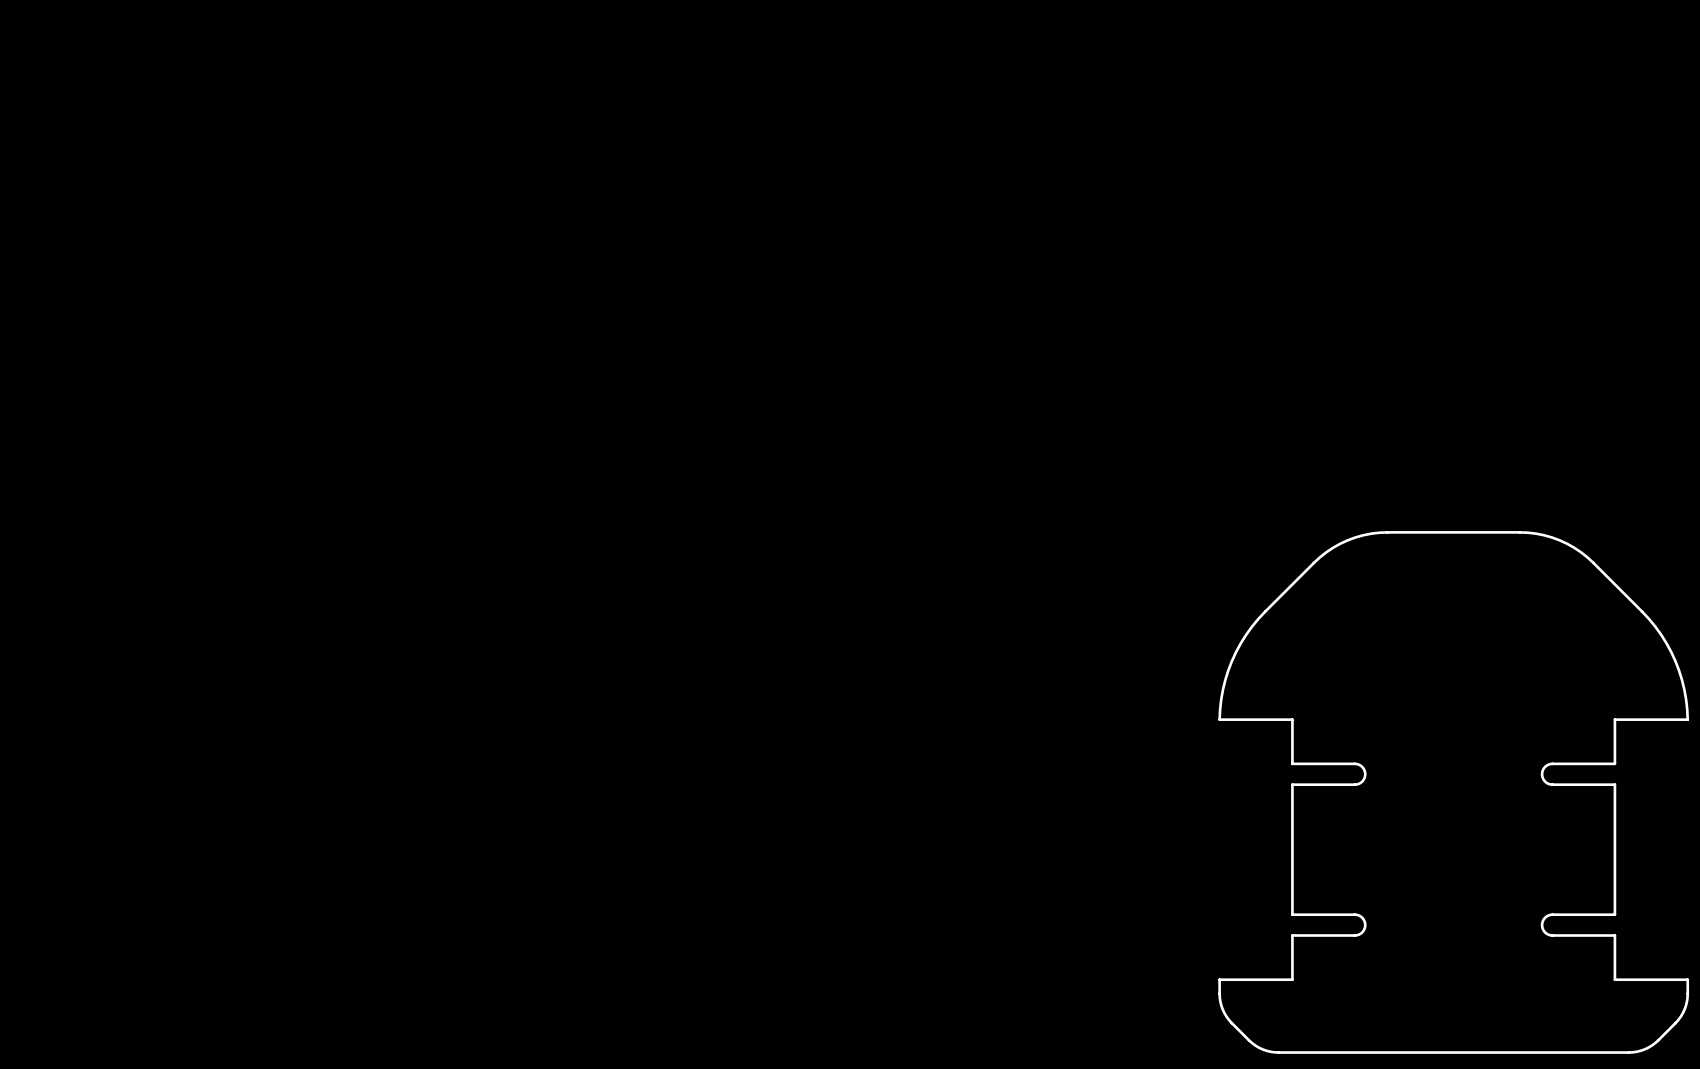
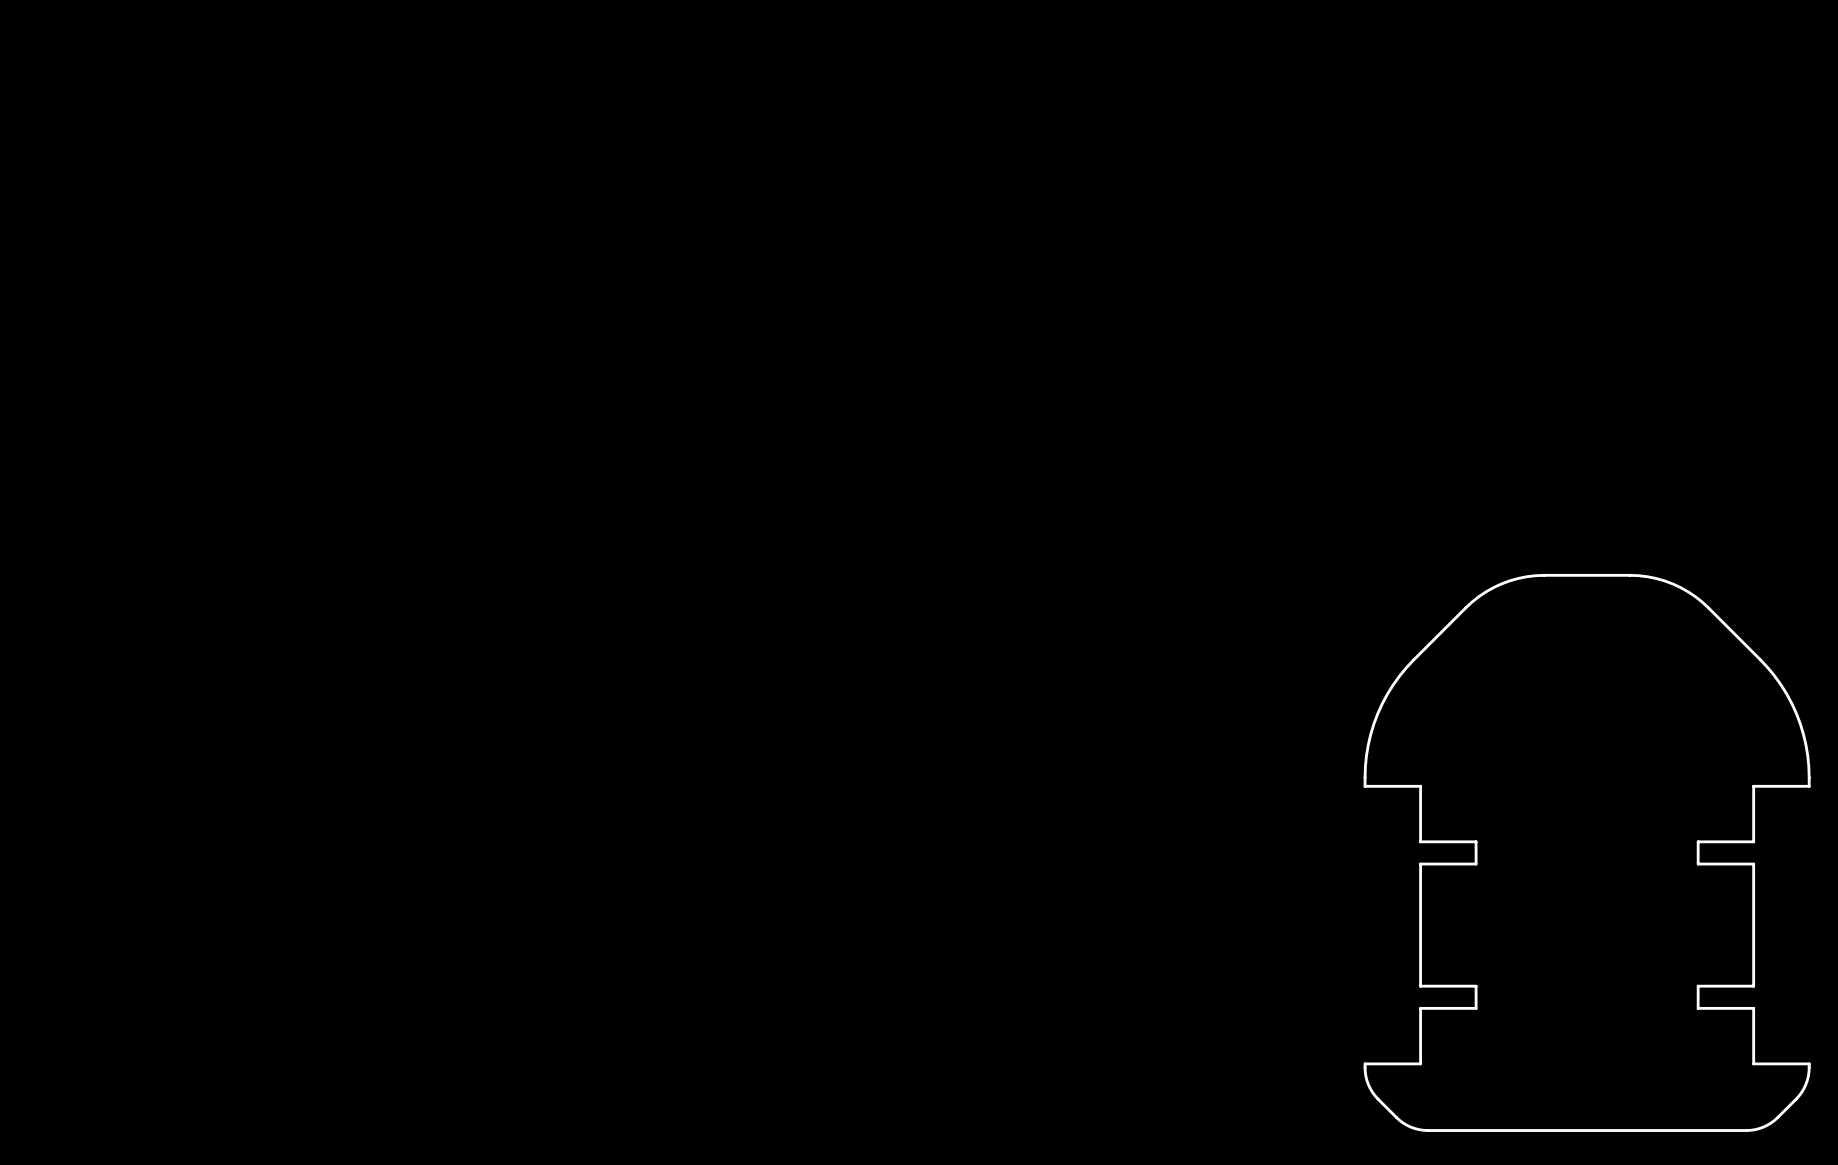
board edge: (1439, 532) (1371, 533) (1347, 540) (1326, 552) (1252, 626) (1236, 652) (1222, 689) (1219, 719) (1292, 719) (1292, 763) (1356, 763) (1361, 766) (1364, 771) (1363, 780) (1356, 784) (1292, 784) (1292, 914) (1357, 915) (1364, 921) (1363, 931) (1354, 935) (1292, 935) (1292, 979) (1219, 979) (1219, 997) (1224, 1013) (1231, 1023) (1255, 1045) (1274, 1052) (1330, 1052) -> (1544, 575) (1526, 576) (1501, 583) (1479, 596) (1465, 607) (1413, 659) (1393, 685) (1377, 713) (1368, 745) (1365, 786) (1420, 786) (1420, 841) (1476, 841) (1476, 864) (1420, 864) (1420, 986) (1476, 986) (1476, 1008) (1420, 1008) (1420, 1063) (1365, 1063) (1368, 1084) (1378, 1099) (1403, 1123) (1414, 1128) (1427, 1130)
board edge: (1642, 611) (1661, 634) (1675, 661) (1684, 689) (1687, 719) (1614, 719) (1614, 763) (1552, 763) (1544, 767) (1542, 778) (1549, 784) (1614, 784) (1614, 914) (1551, 914) (1544, 918) (1542, 926) (1545, 932) (1551, 935) (1614, 935) (1614, 979) (1687, 979) (1687, 990) -> (1760, 659) (1781, 685) (1796, 713) (1805, 745) (1809, 786) (1753, 786) (1753, 841) (1698, 841) (1698, 864) (1753, 864) (1753, 986) (1698, 986) (1698, 1008) (1753, 1008) (1753, 1063) (1809, 1063)

